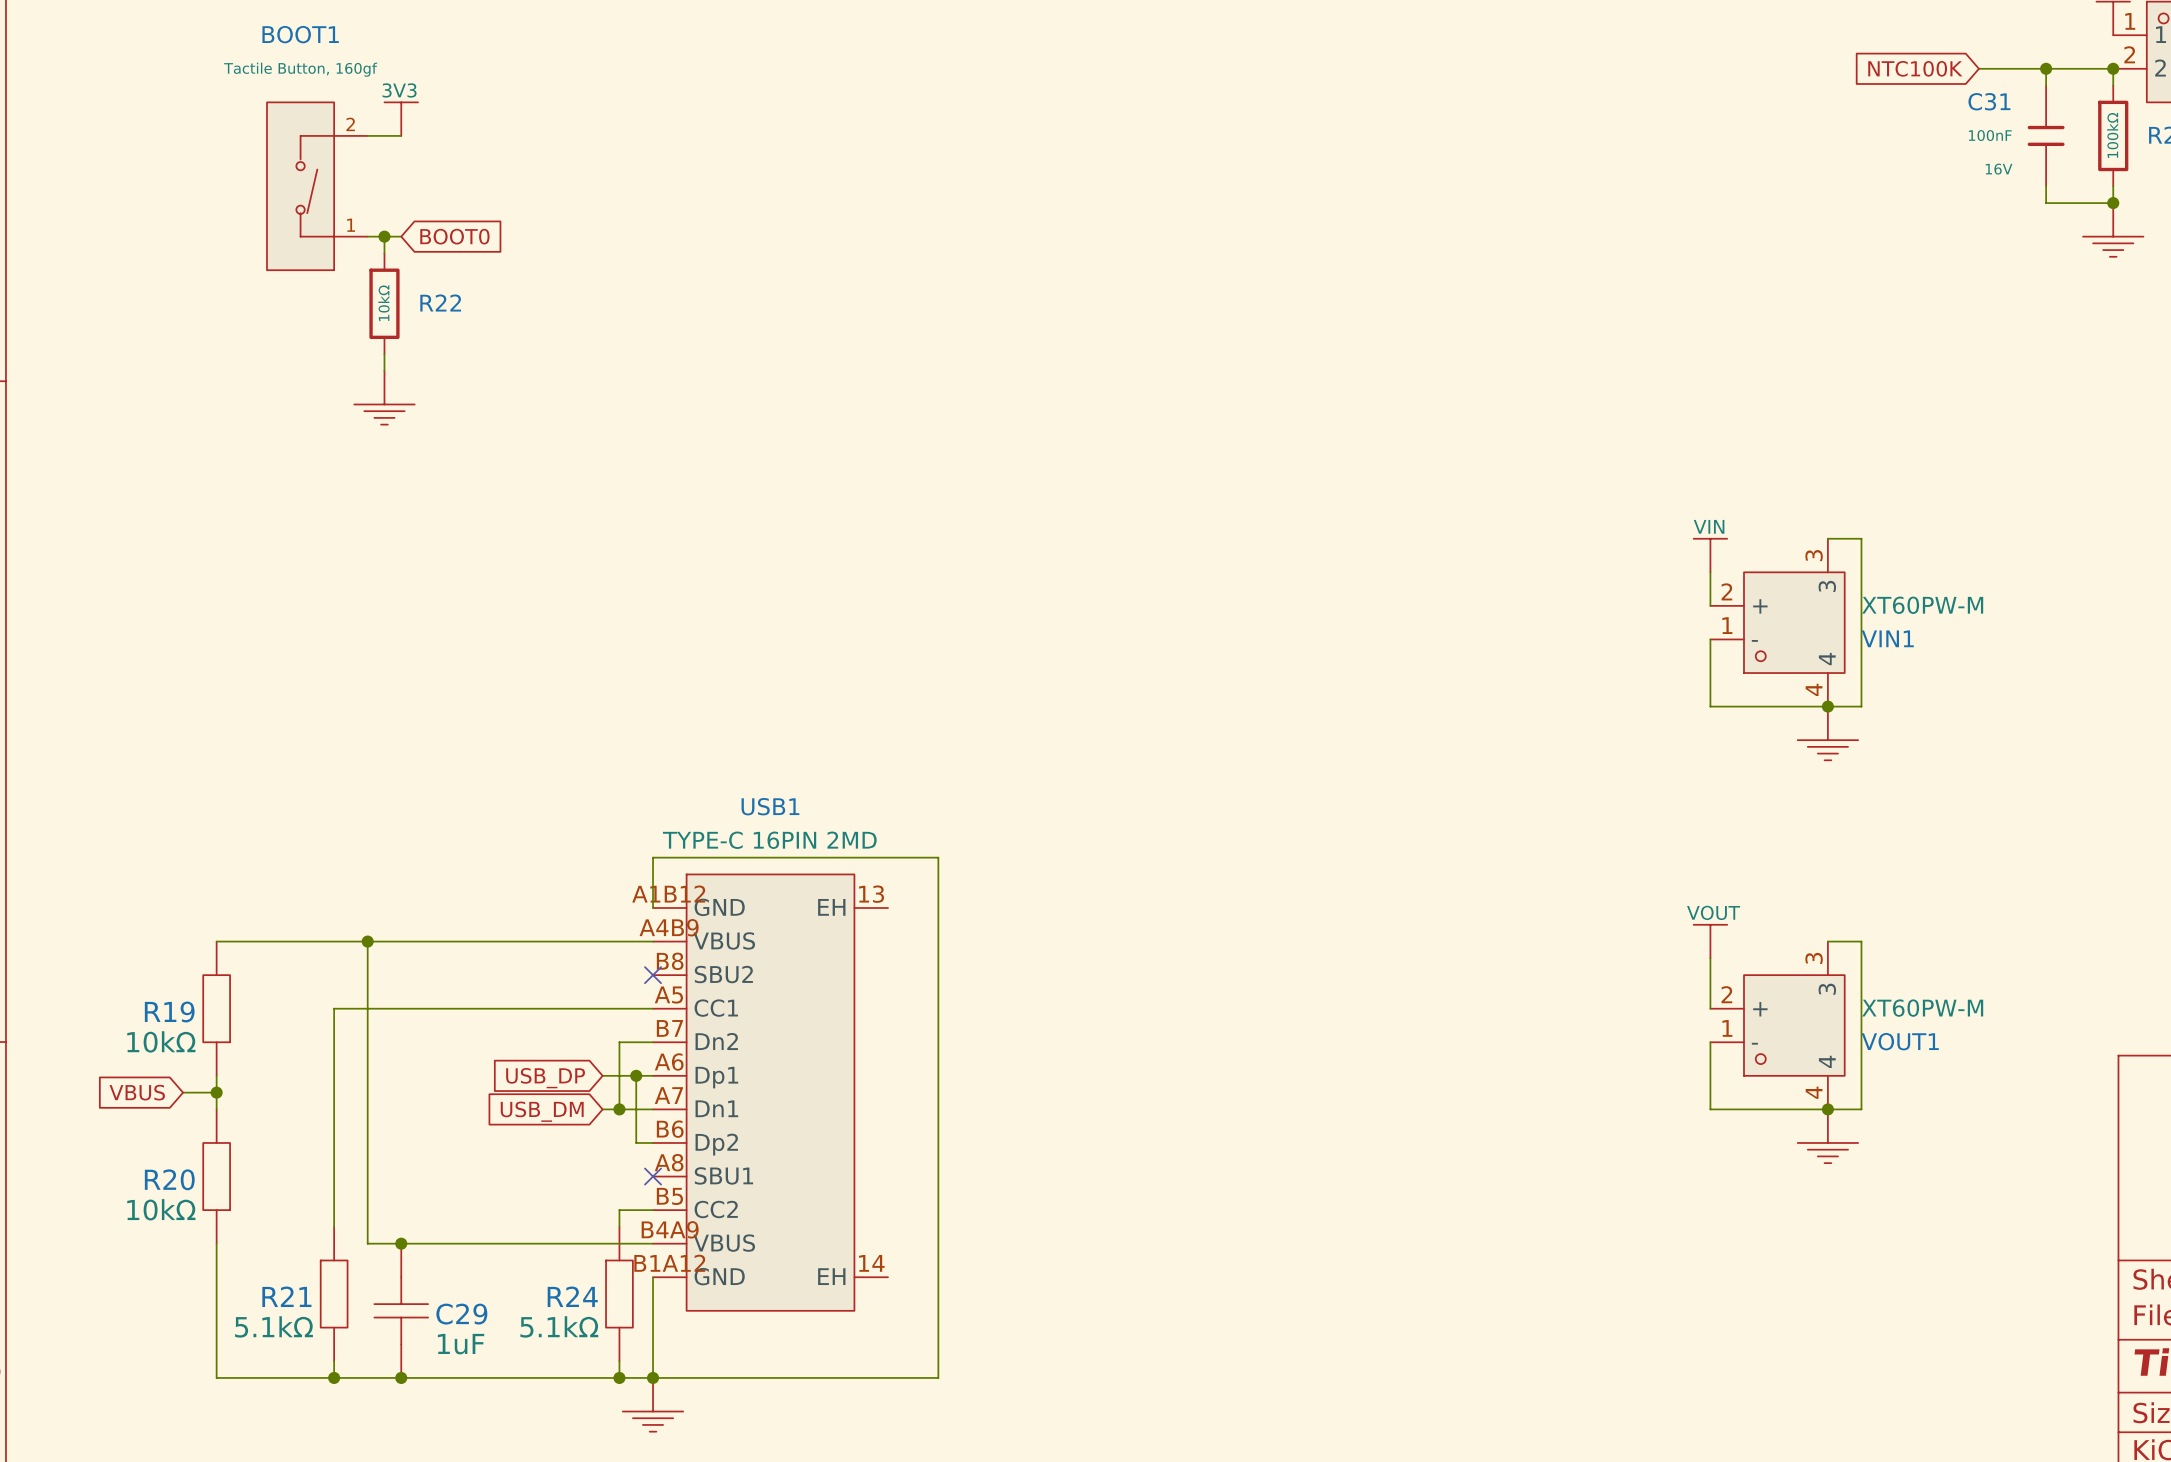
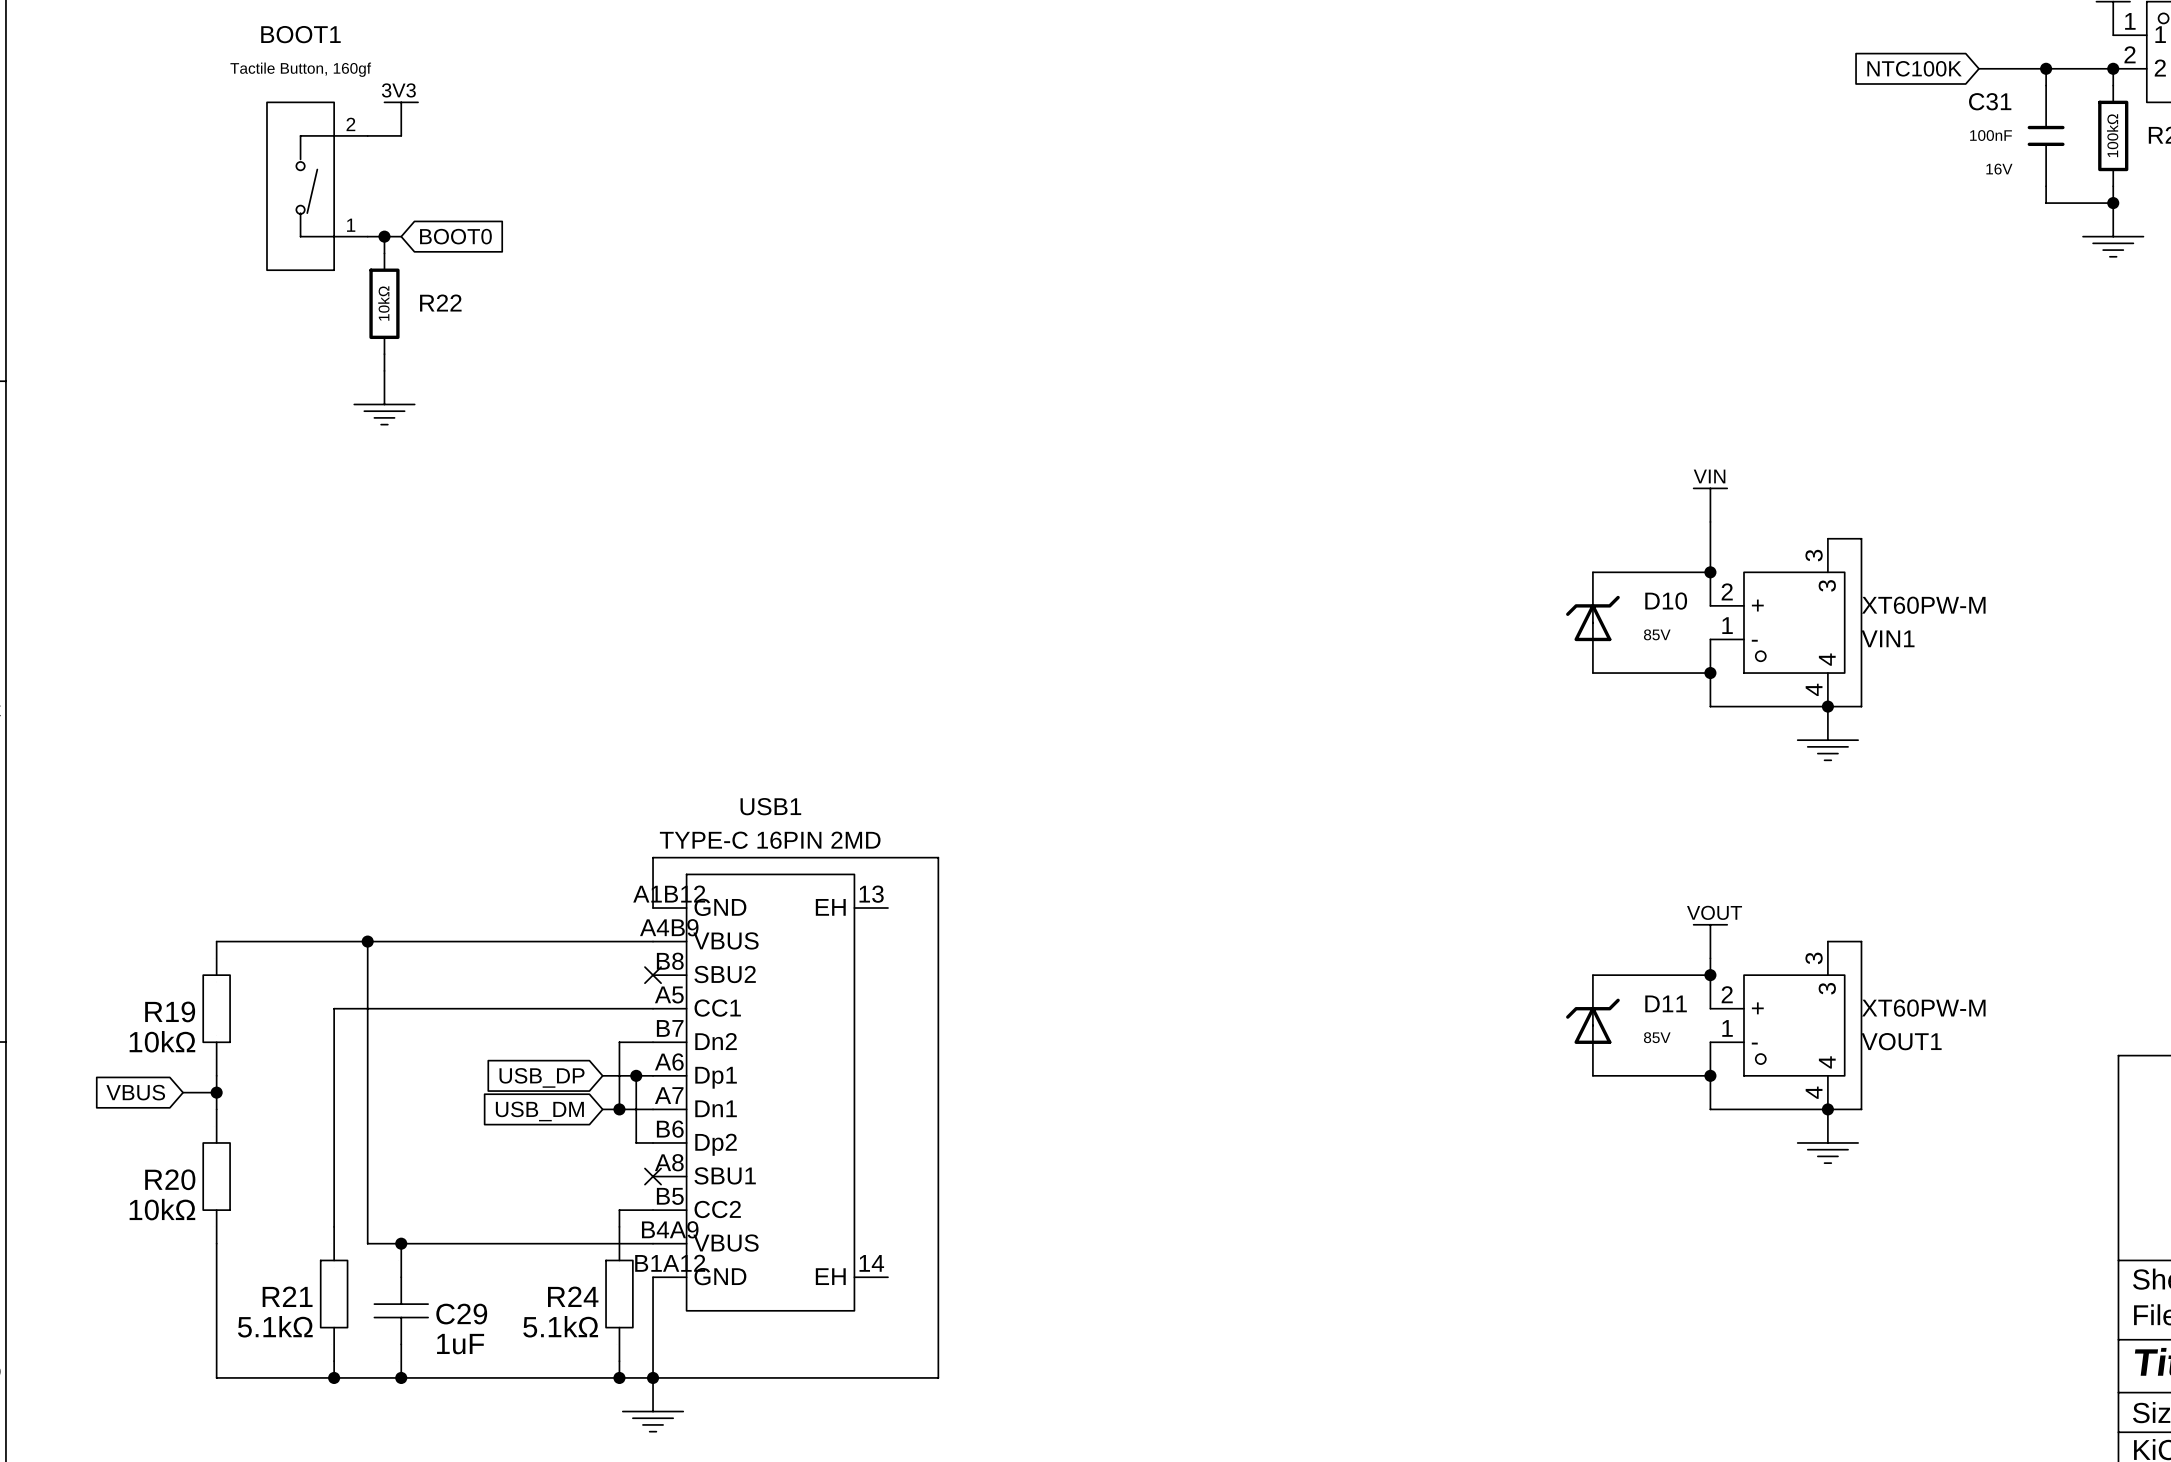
wire: none -> (1710, 521) (1710, 572) (1592, 572)
power symbol position: VIN (1710, 555) -> VIN (1710, 505)
junction: none -> (1710, 572)
D10: none -> 85V (1592, 622)
wire: none -> (1592, 673) (1710, 673)
junction: none -> (1710, 673)
wire: none -> (1592, 975) (1710, 975)
junction: none -> (1710, 975)
D11: none -> 85V (1592, 1025)
wire: none -> (1592, 1075) (1710, 1075)
junction: none -> (1710, 1075)

